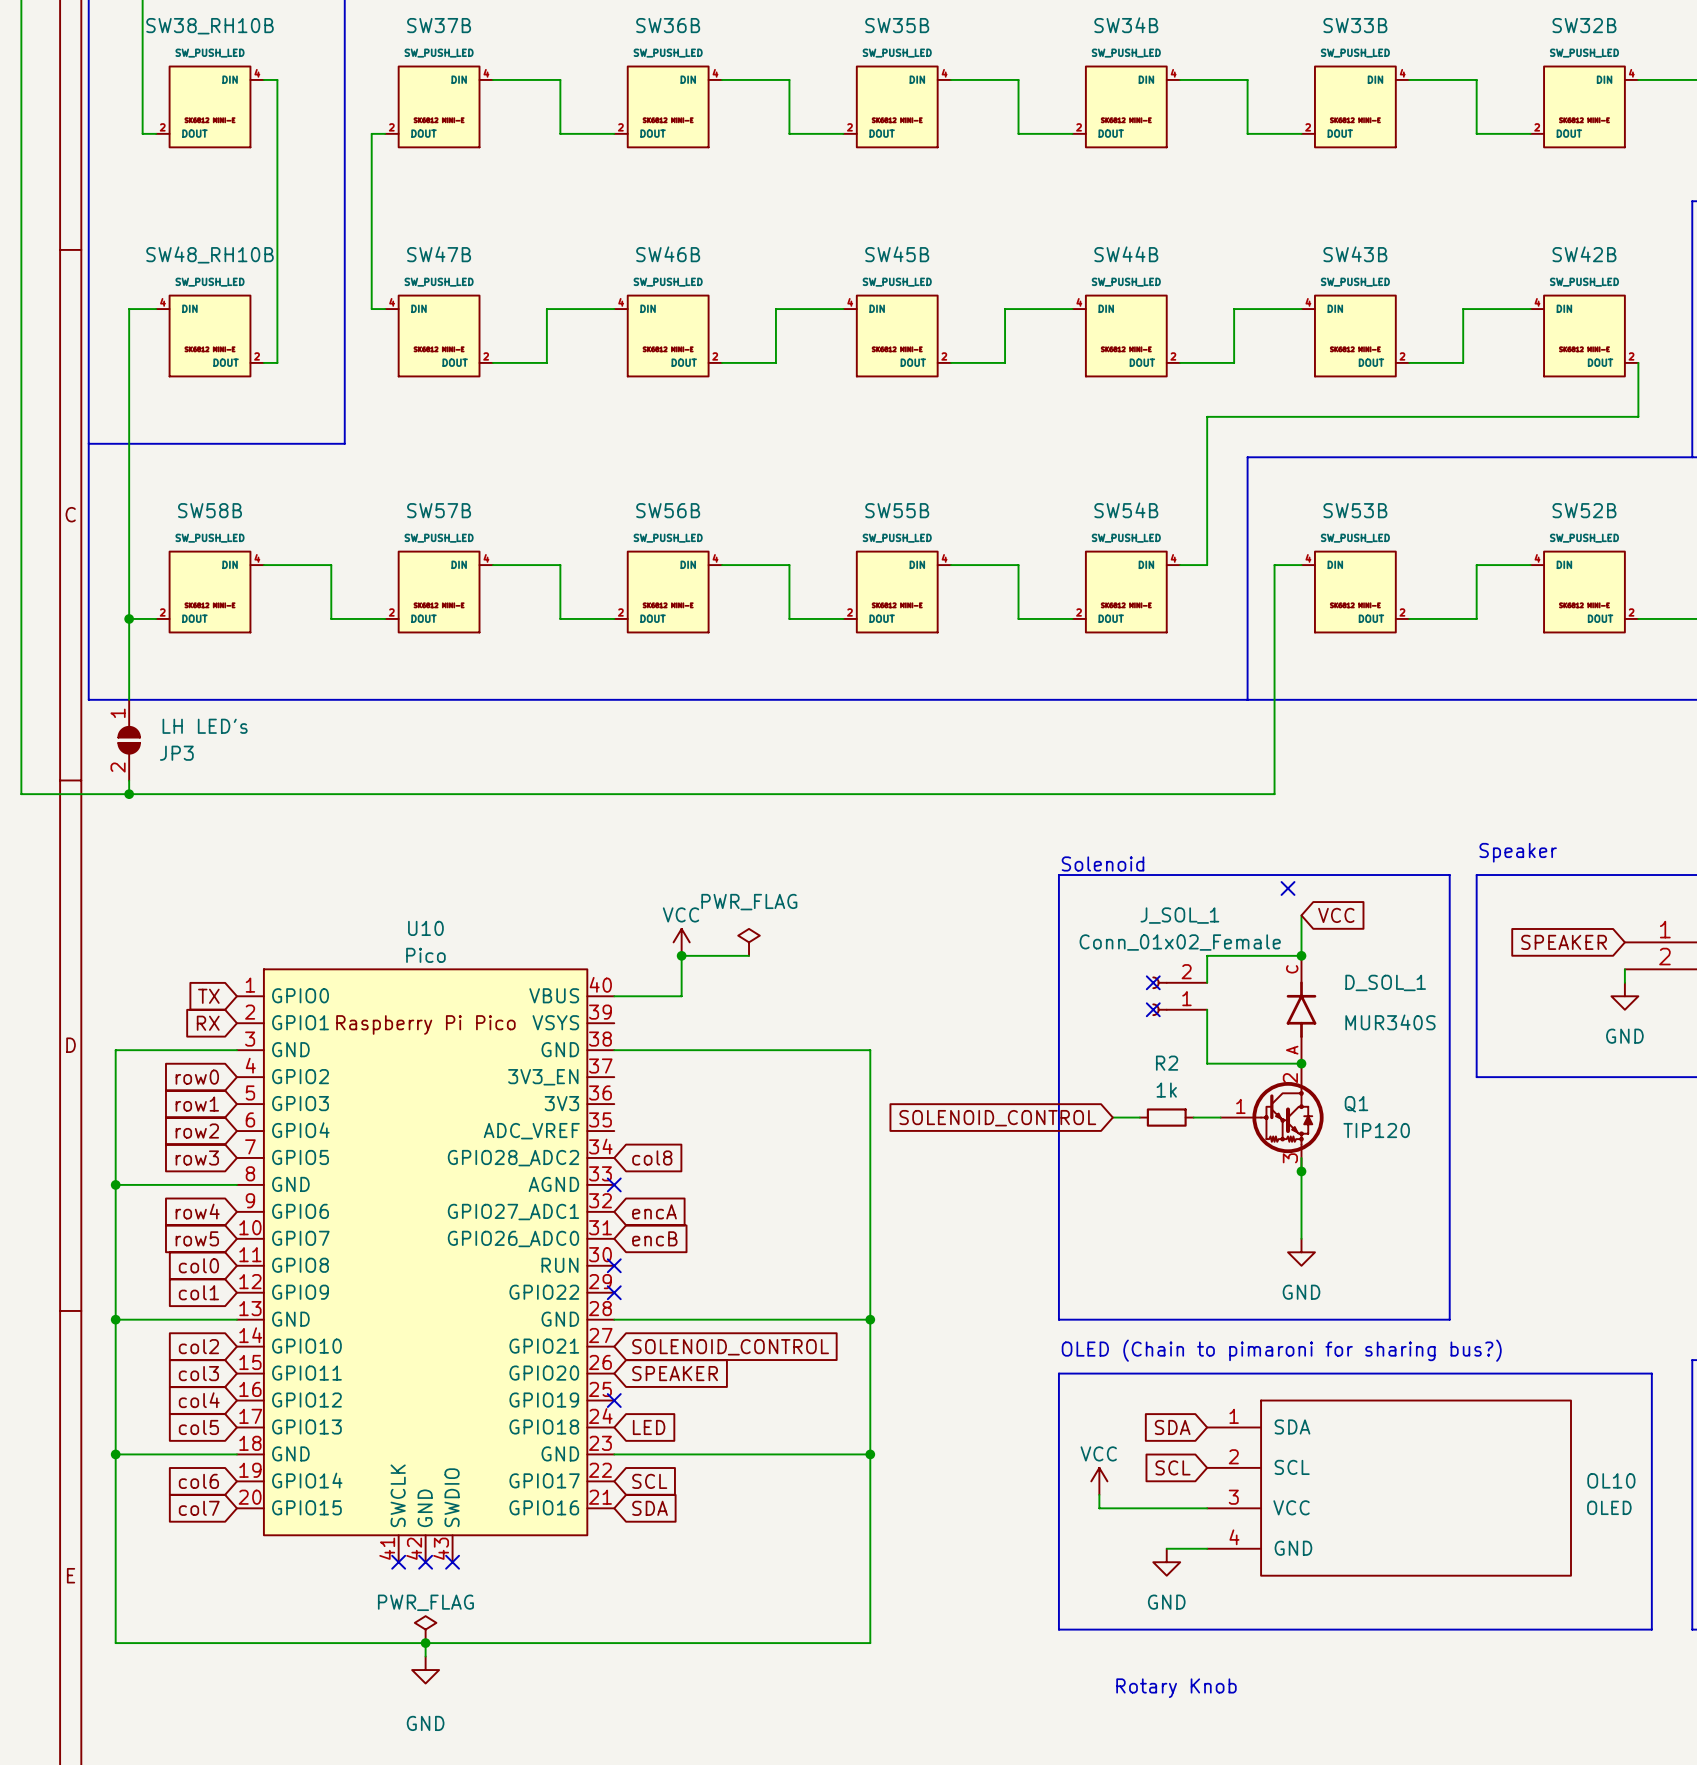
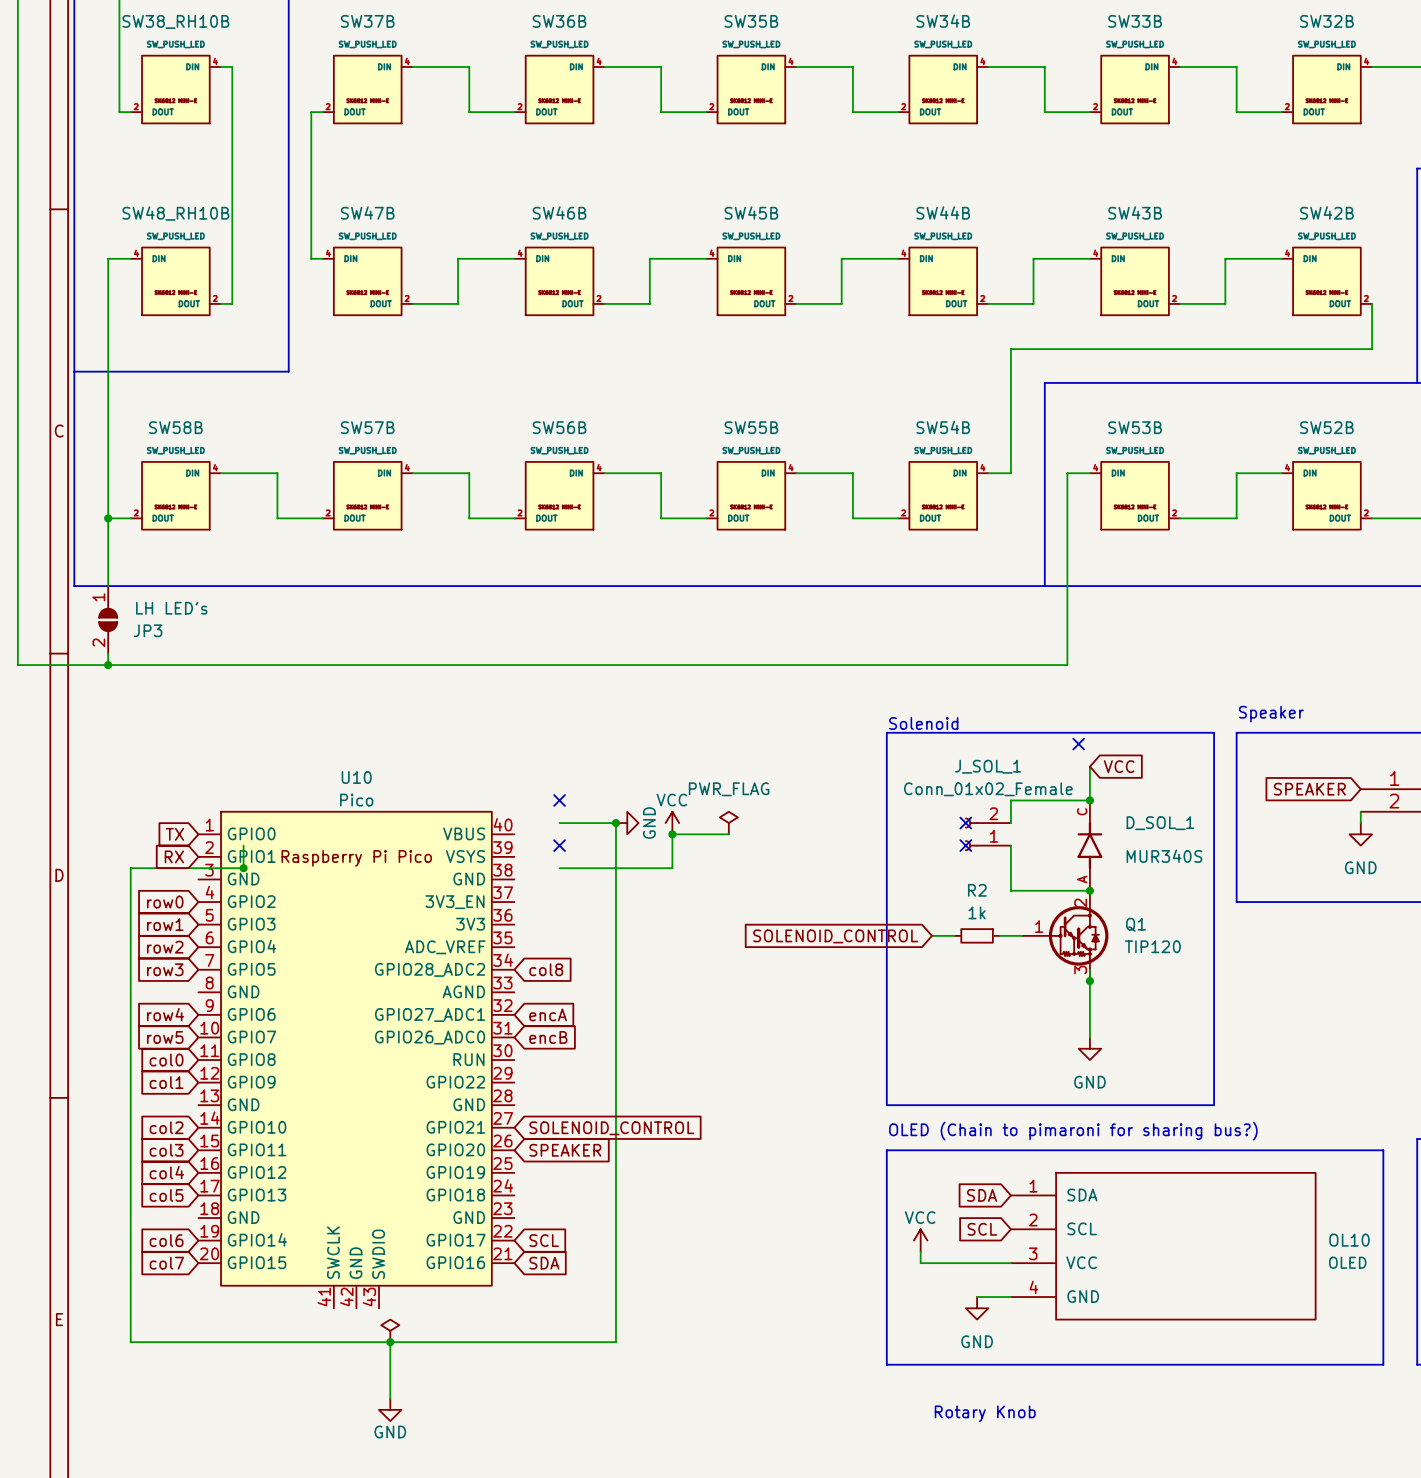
power symbol position: VCC (681, 942) -> VCC (672, 823)
power symbol position: PWR_FLAG (749, 942) -> PWR_FLAG (728, 823)
no-connect mark: none -> (559, 800)
junction position: (681, 955) -> (615, 823)
wire: (749, 955) (681, 955) (681, 996) (614, 996) -> none
wire: none -> (559, 823) (615, 823) (615, 1342) (130, 1342) (130, 868) (243, 868) (243, 845)
power symbol: none -> GND (627, 823)
junction: none -> (672, 834)
wire: none -> (728, 834) (672, 834) (672, 868) (559, 868)
no-connect mark: none -> (559, 845)
junction: none -> (243, 868)
wire: (236, 1050) (115, 1050) (115, 1643) (870, 1643) (870, 1050) (614, 1050) -> none
wire: (115, 1184) (236, 1184) -> none
junction: (115, 1184) -> none
no-connect mark: (614, 1184) -> none
no-connect mark: (614, 1265) -> none
no-connect mark: (614, 1292) -> none
wire: (115, 1319) (236, 1319) -> none
junction: (115, 1319) -> none
wire: (614, 1319) (870, 1319) -> none
junction: (870, 1319) -> none
no-connect mark: (614, 1400) -> none
global label: LED (649, 1427) -> none
wire: (115, 1454) (236, 1454) -> none
junction: (115, 1454) -> none
wire: (614, 1454) (870, 1454) -> none
junction: (870, 1454) -> none
no-connect mark: (398, 1562) -> none
no-connect mark: (425, 1562) -> none
no-connect mark: (452, 1562) -> none
power symbol: none -> (390, 1330)
wire: none -> (390, 1342) (390, 1398)
power symbol: PWR_FLAG (425, 1629) -> none
wire: (425, 1643) (425, 1656) -> none
junction position: (425, 1643) -> (390, 1342)
power symbol position: GND (425, 1670) -> GND (390, 1409)
power symbol text position: GND (425, 1723) -> GND (390, 1432)

